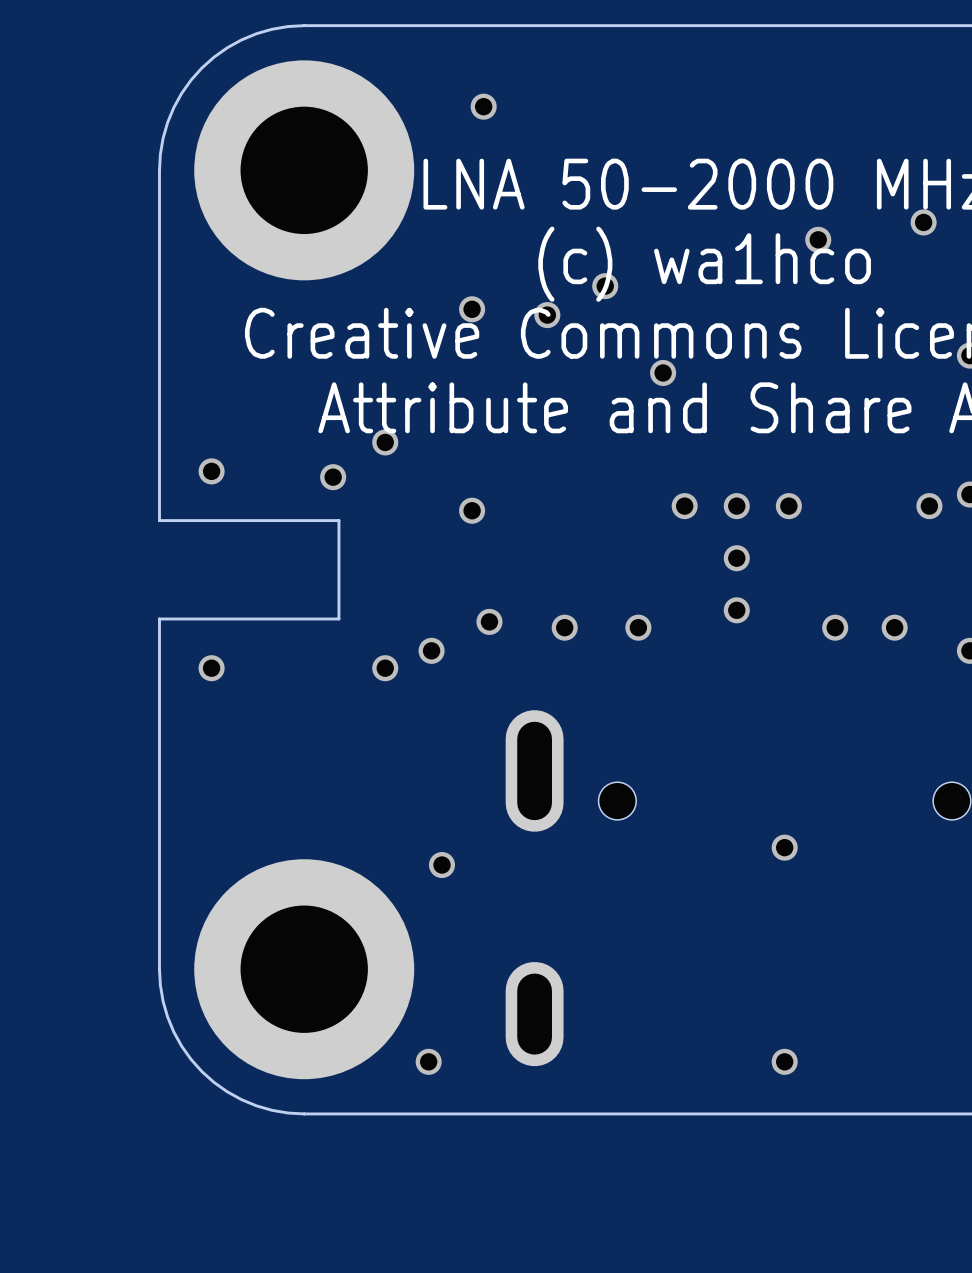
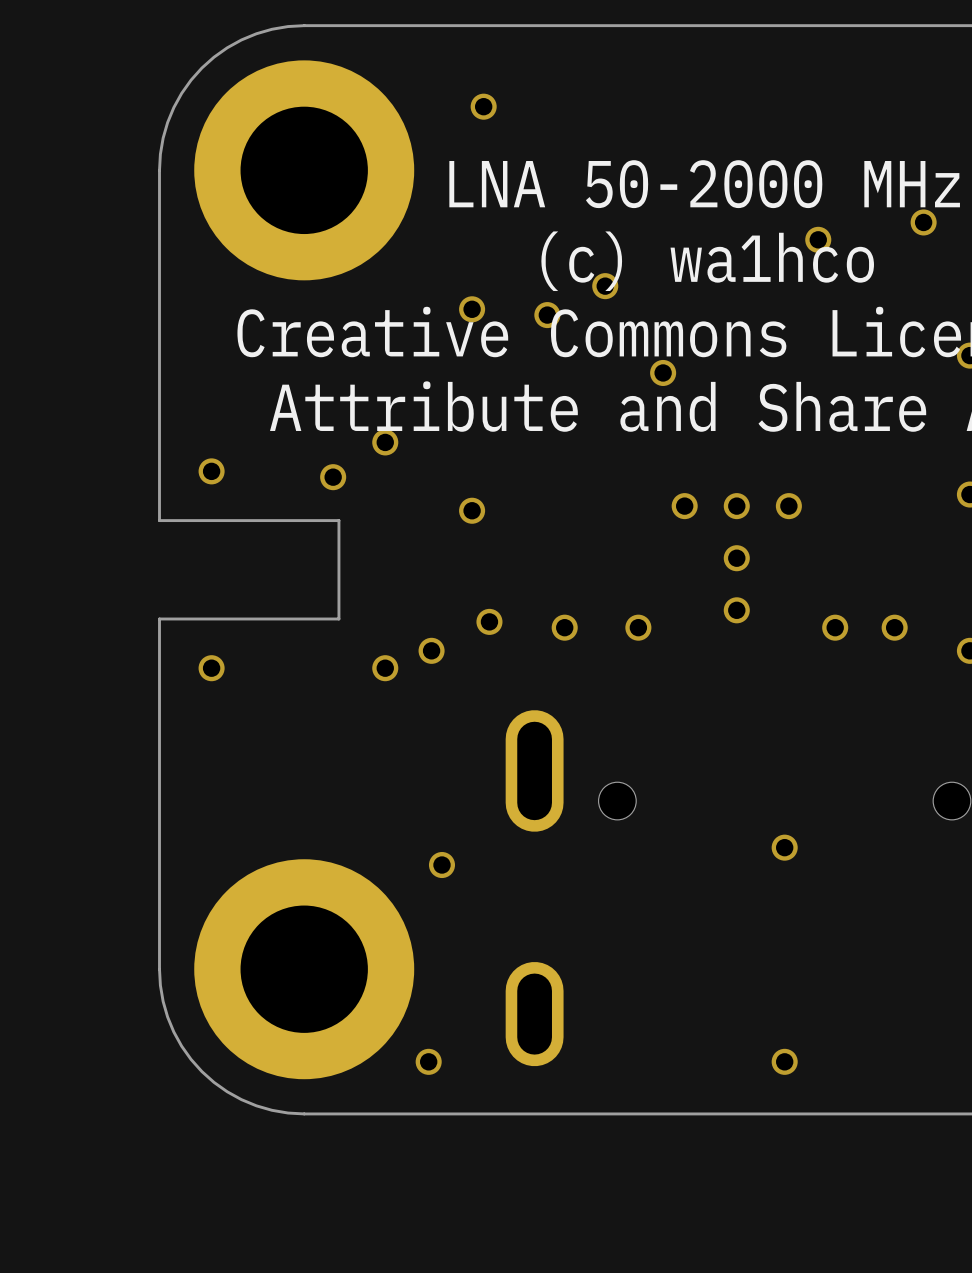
via: (929, 506) -> none

